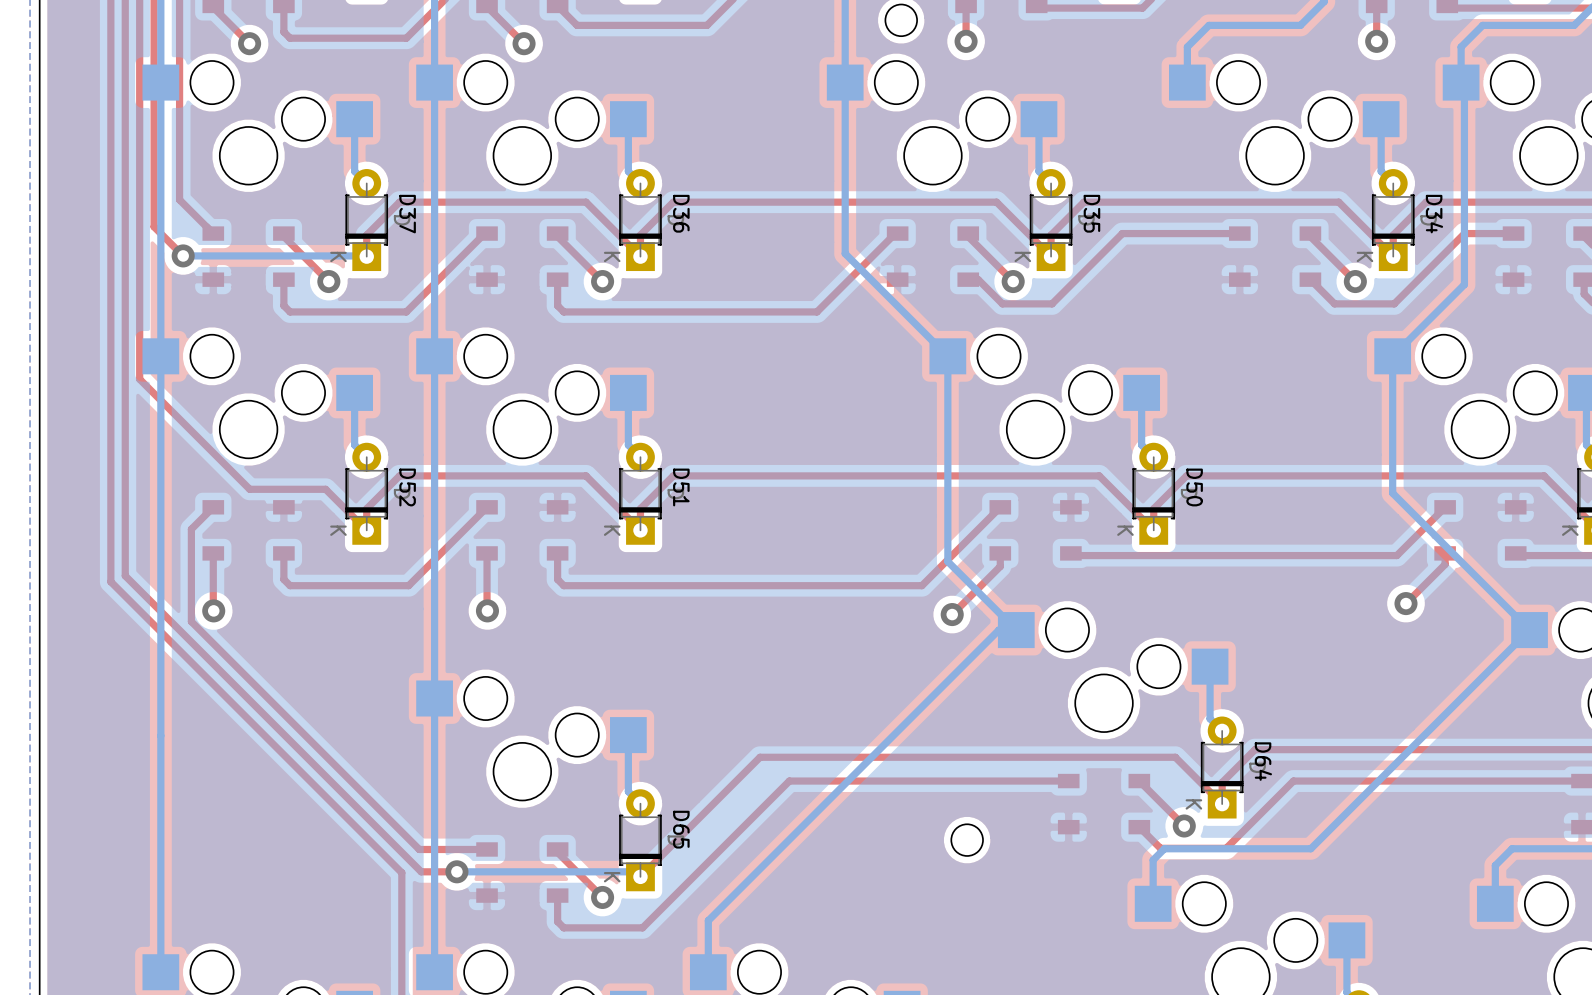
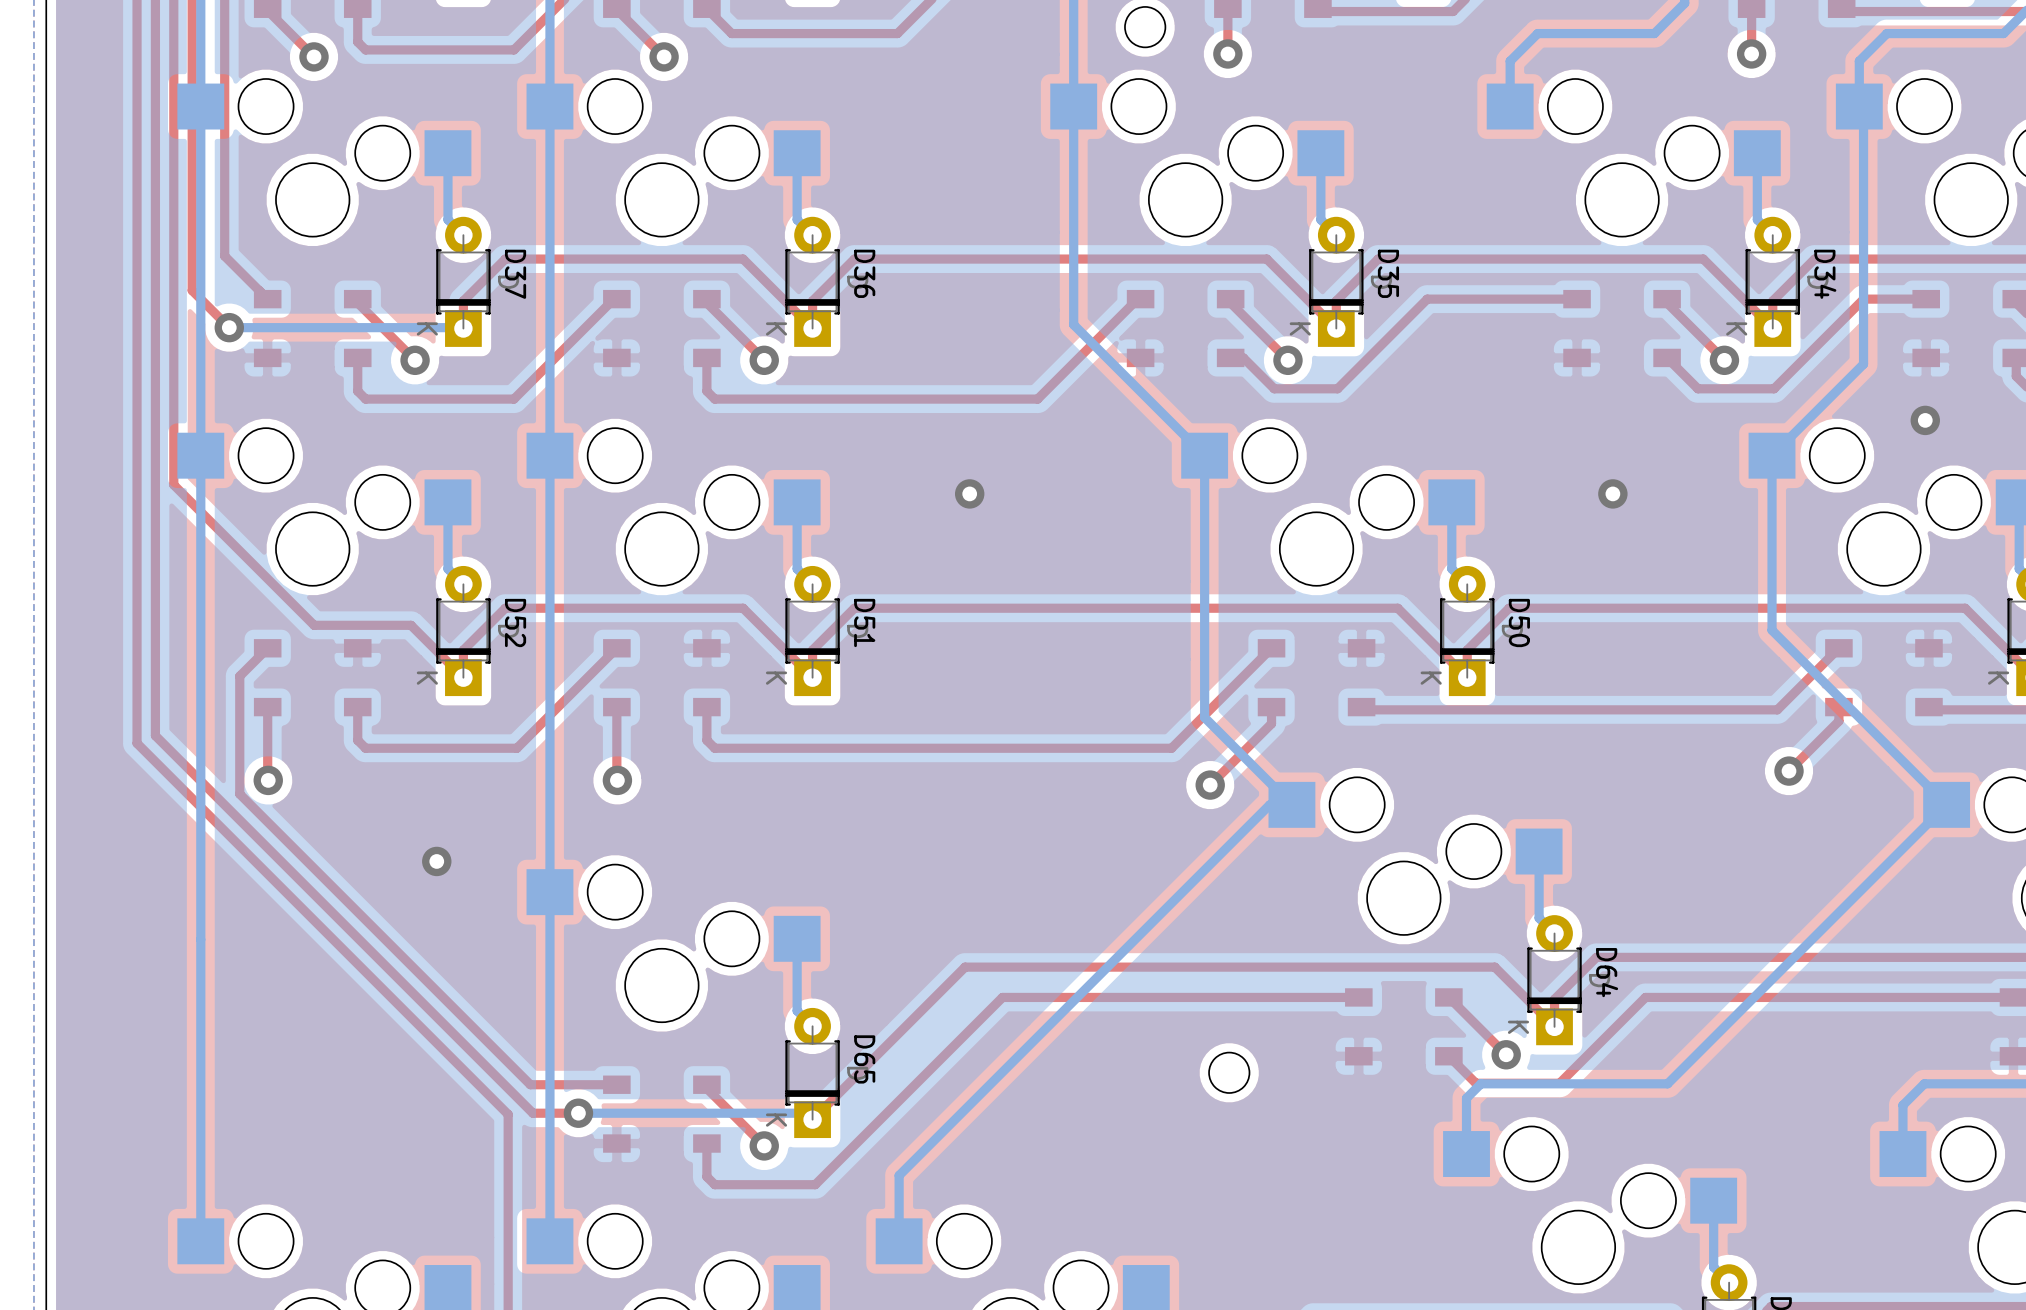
via: none -> (1925, 420)
via: none -> (969, 493)
via: none -> (1612, 493)
via: none -> (436, 861)

